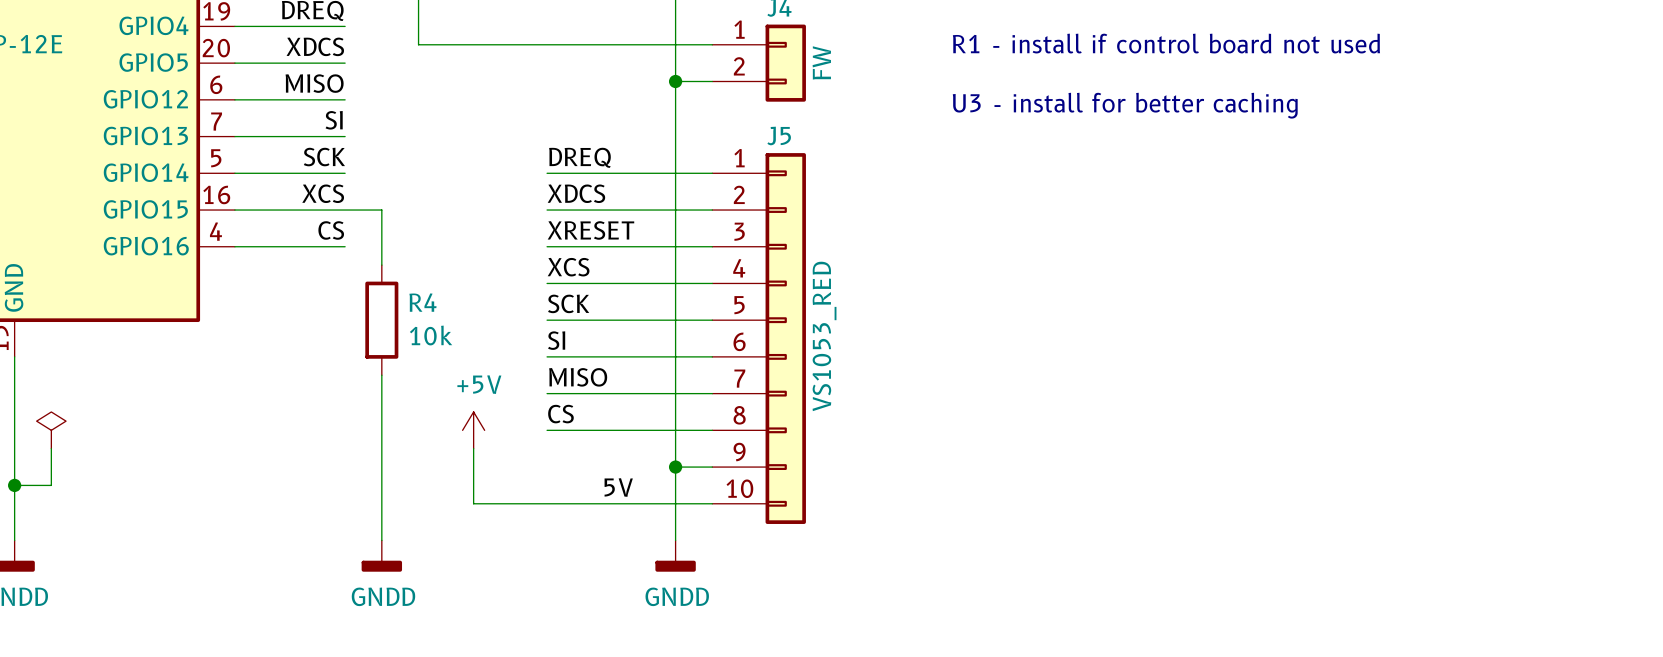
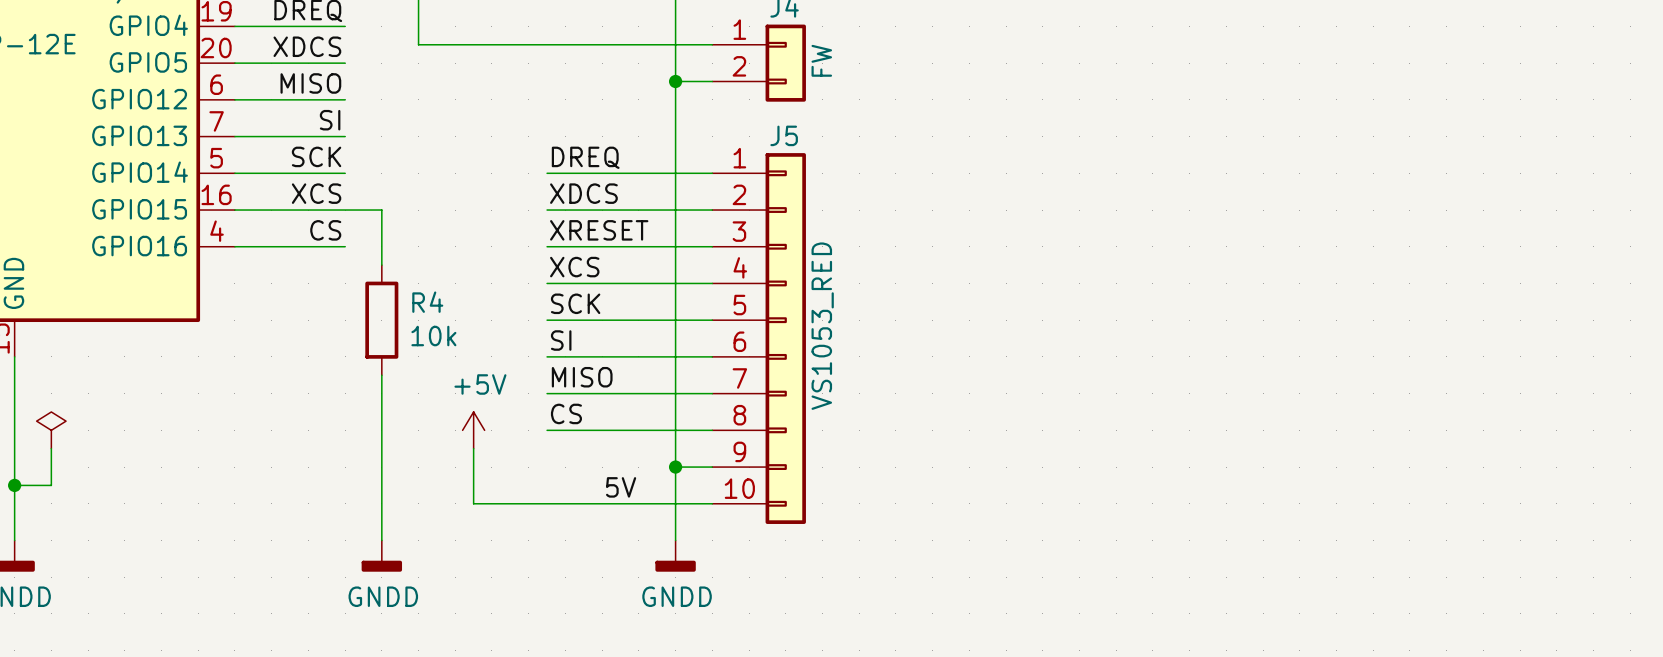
text: R1 - install if control board not used (1166, 43) -> none
text: U3 - install for better caching (1125, 105) -> none

